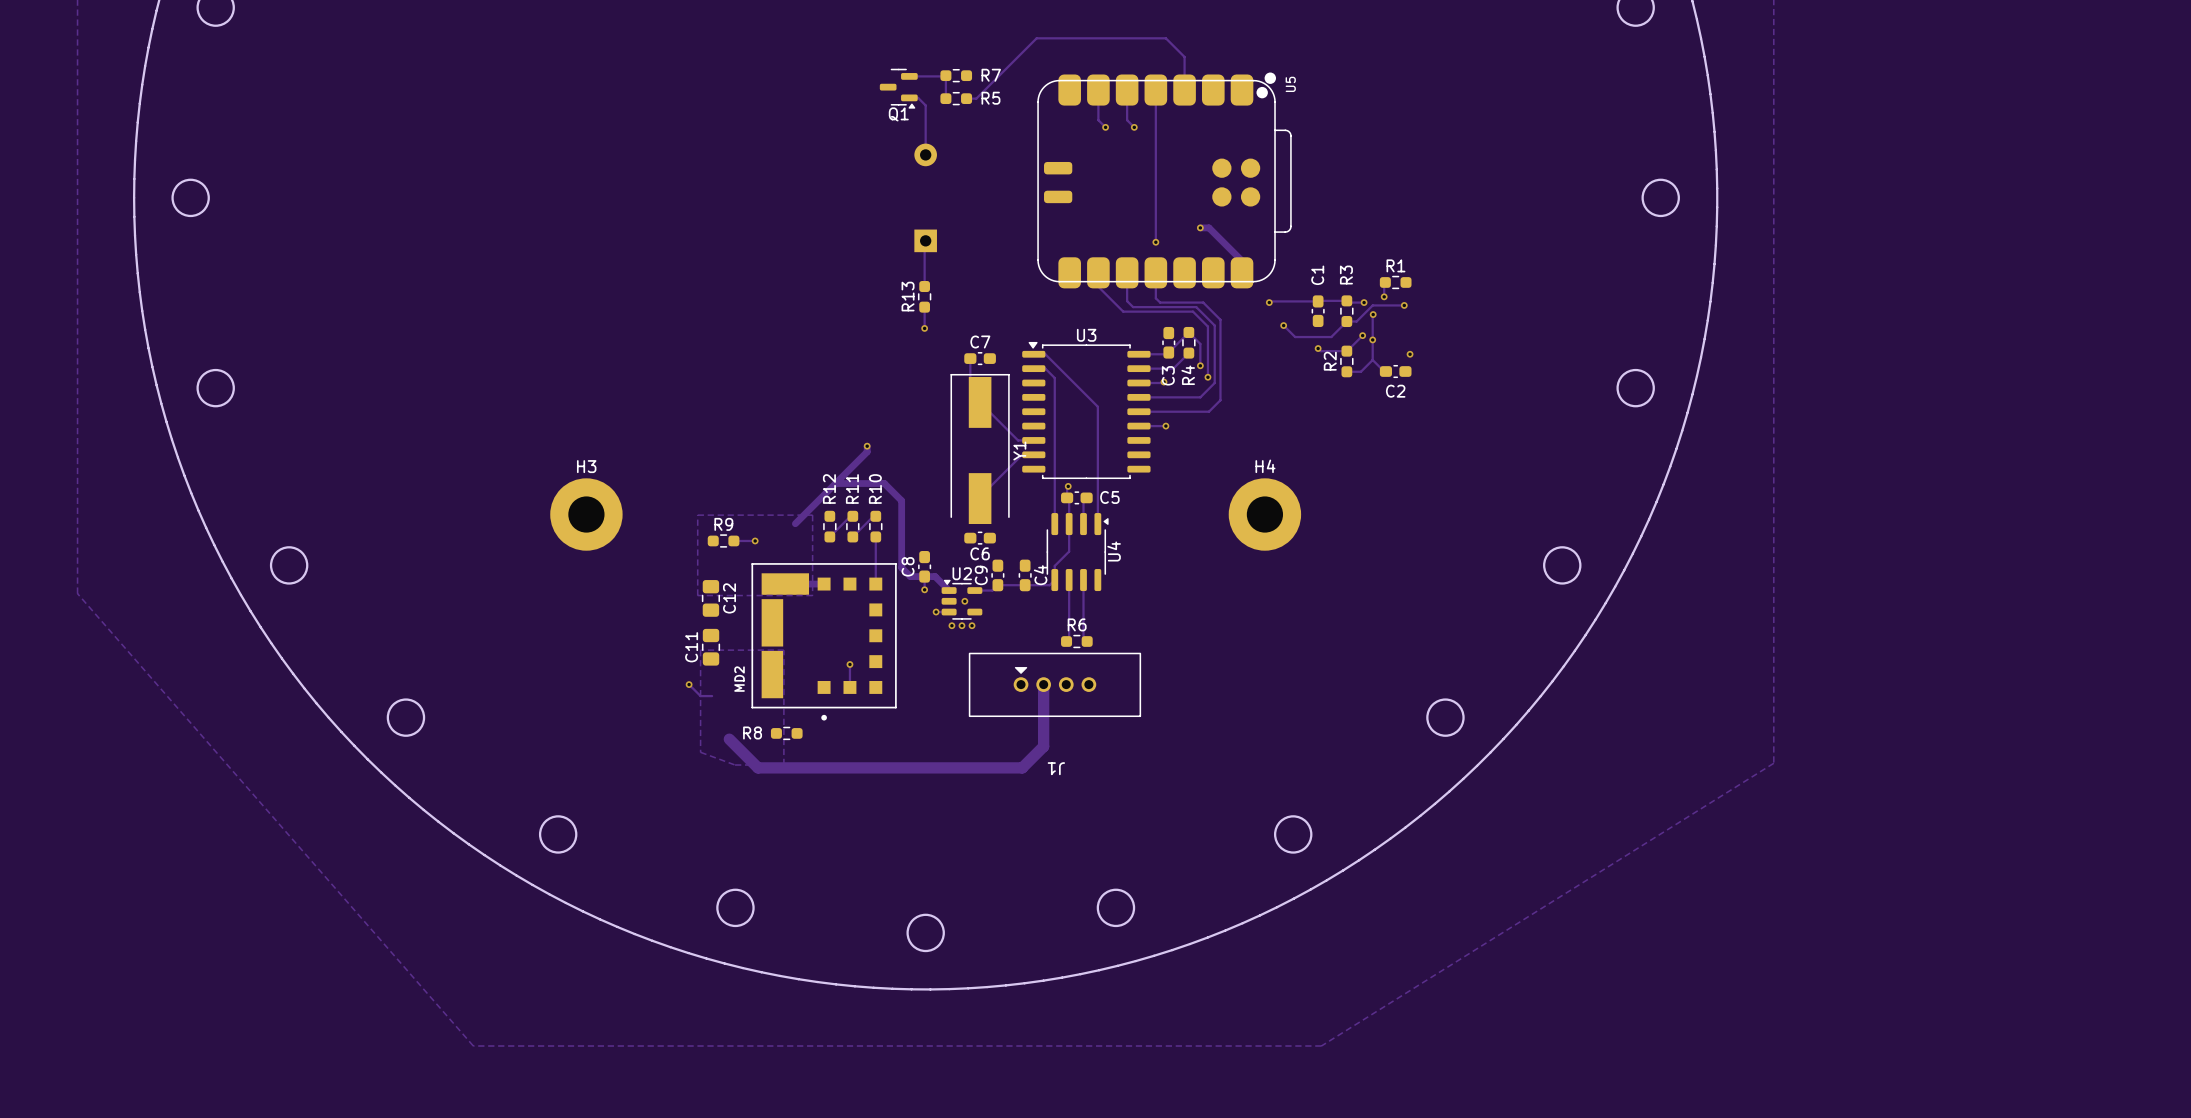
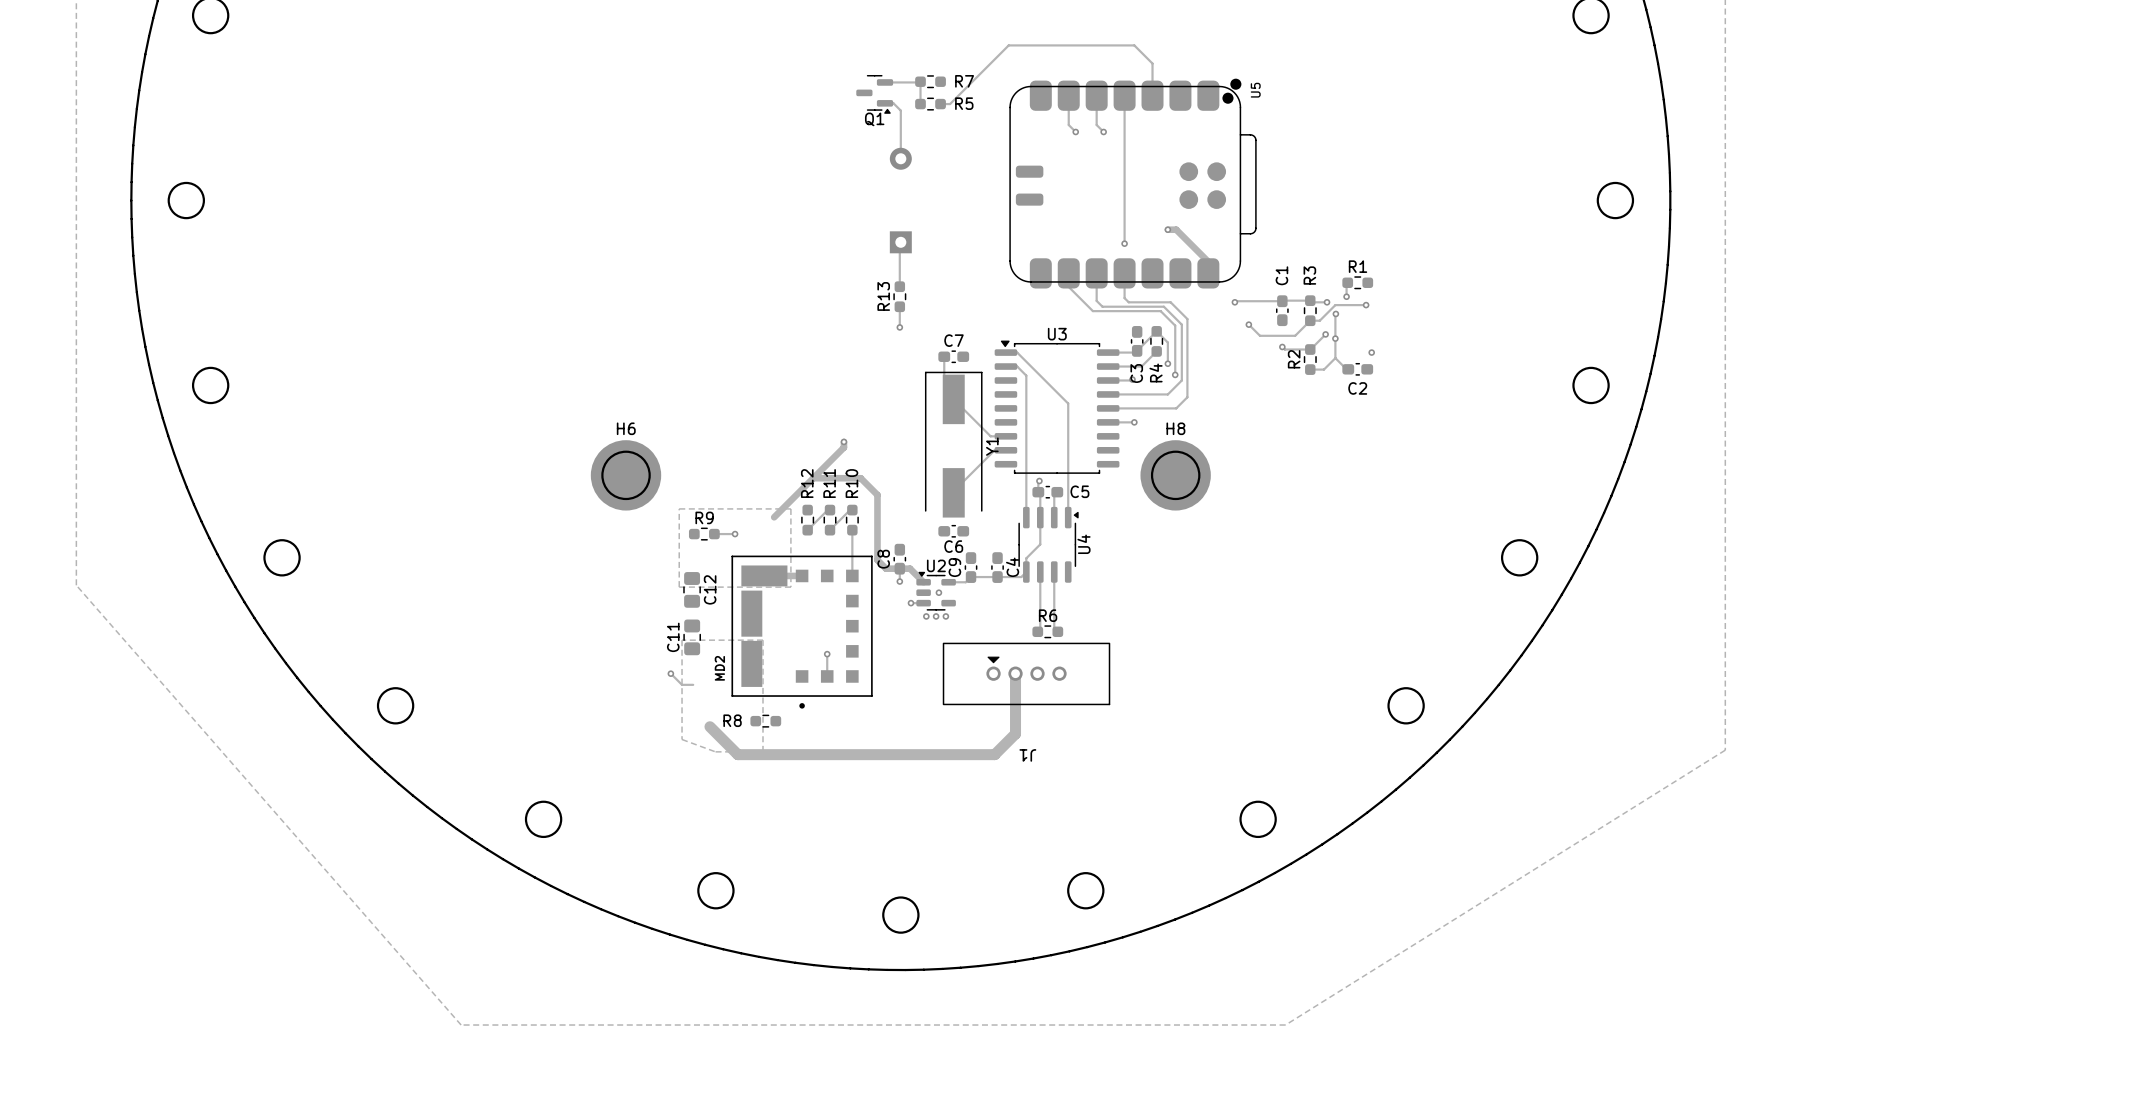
round board edge: none -> [601, 450, 651, 501]
round board edge: none -> [1150, 450, 1201, 501]
H6: none -> (626, 475)
H8: none -> (1175, 475)
H3: (586, 514) -> none
H4: (1264, 514) -> none

